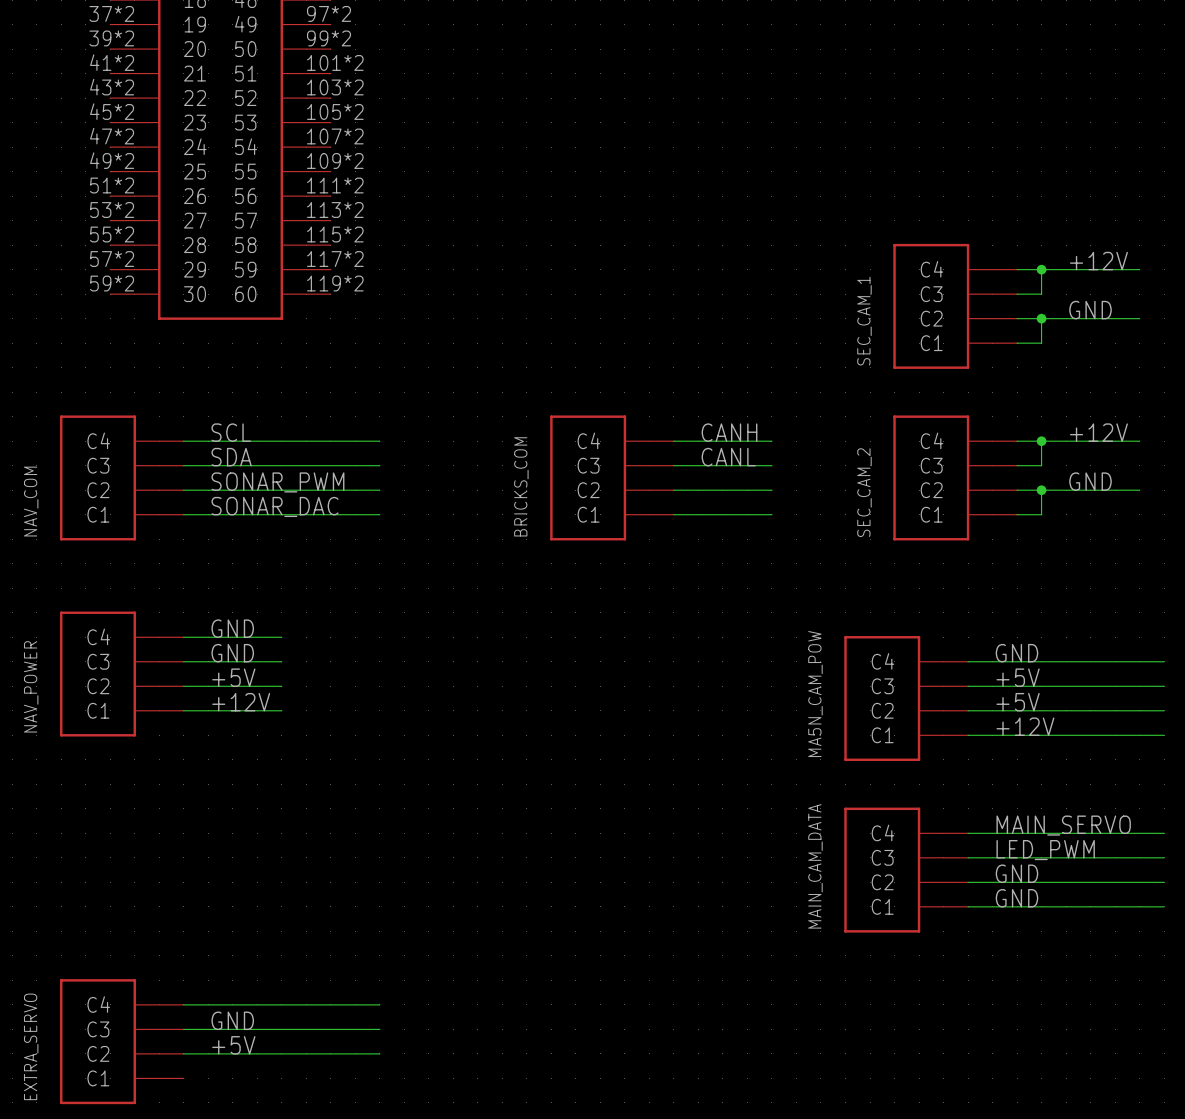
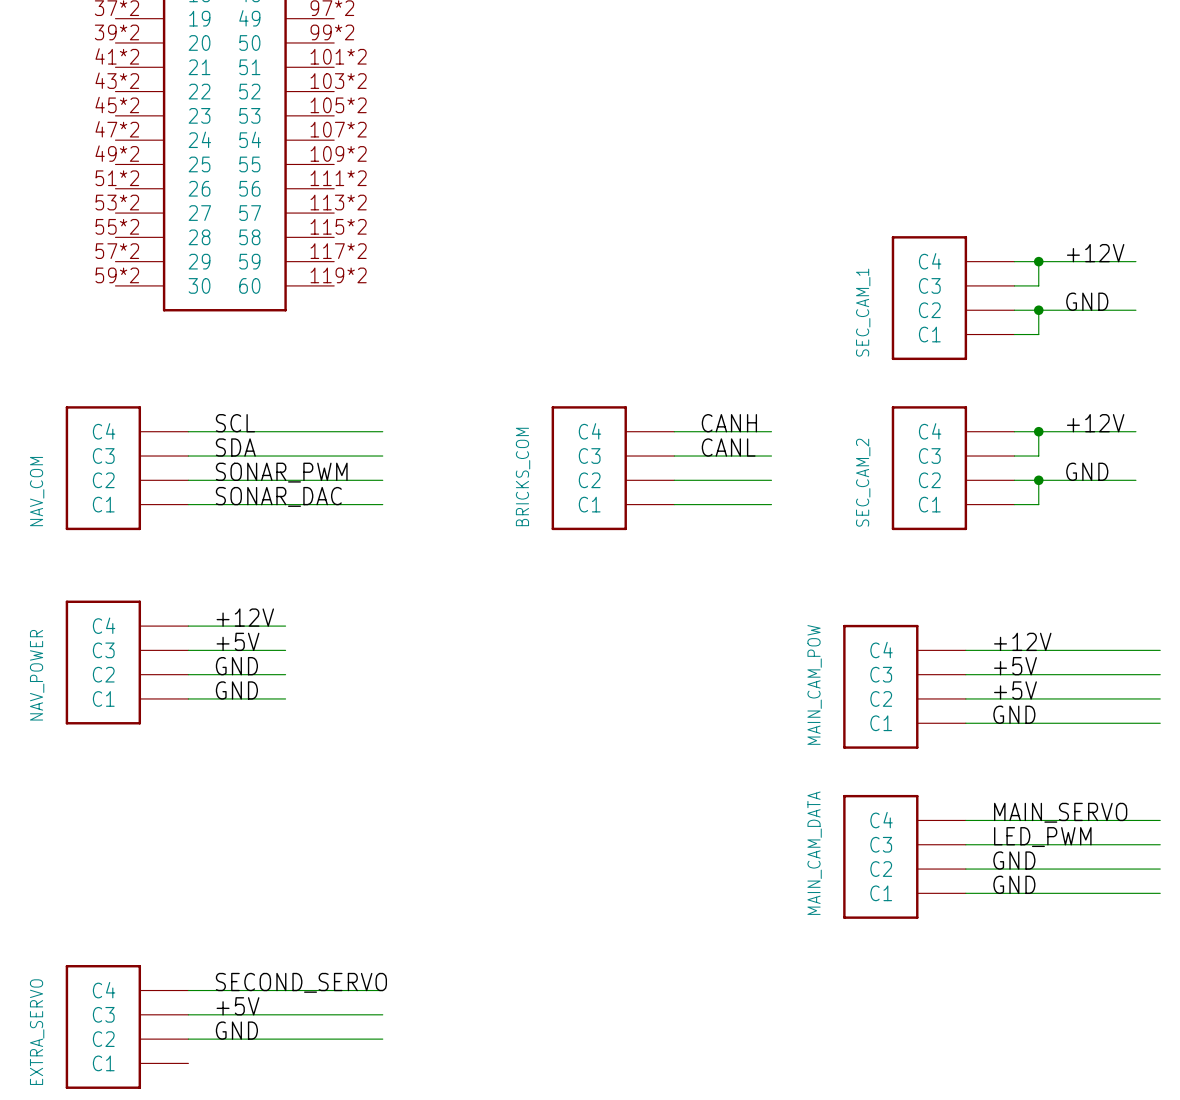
label: GND (232, 628) -> +12V (245, 617)
label: GND (232, 653) -> +5V (238, 641)
label: GND (1016, 653) -> +12V (1022, 641)
label: +5V (233, 677) -> GND (236, 666)
MA5N_CAM_POW name: MA5N_CAM_POW (815, 694) -> MAIN_CAM_POW (814, 684)
label: +12V (241, 702) -> GND (236, 690)
label: +12V (1025, 726) -> GND (1014, 714)
label: none -> SECOND_SERVO (301, 982)
label: GND (232, 1020) -> +5V (238, 1006)
label: +5V (233, 1045) -> GND (236, 1030)

